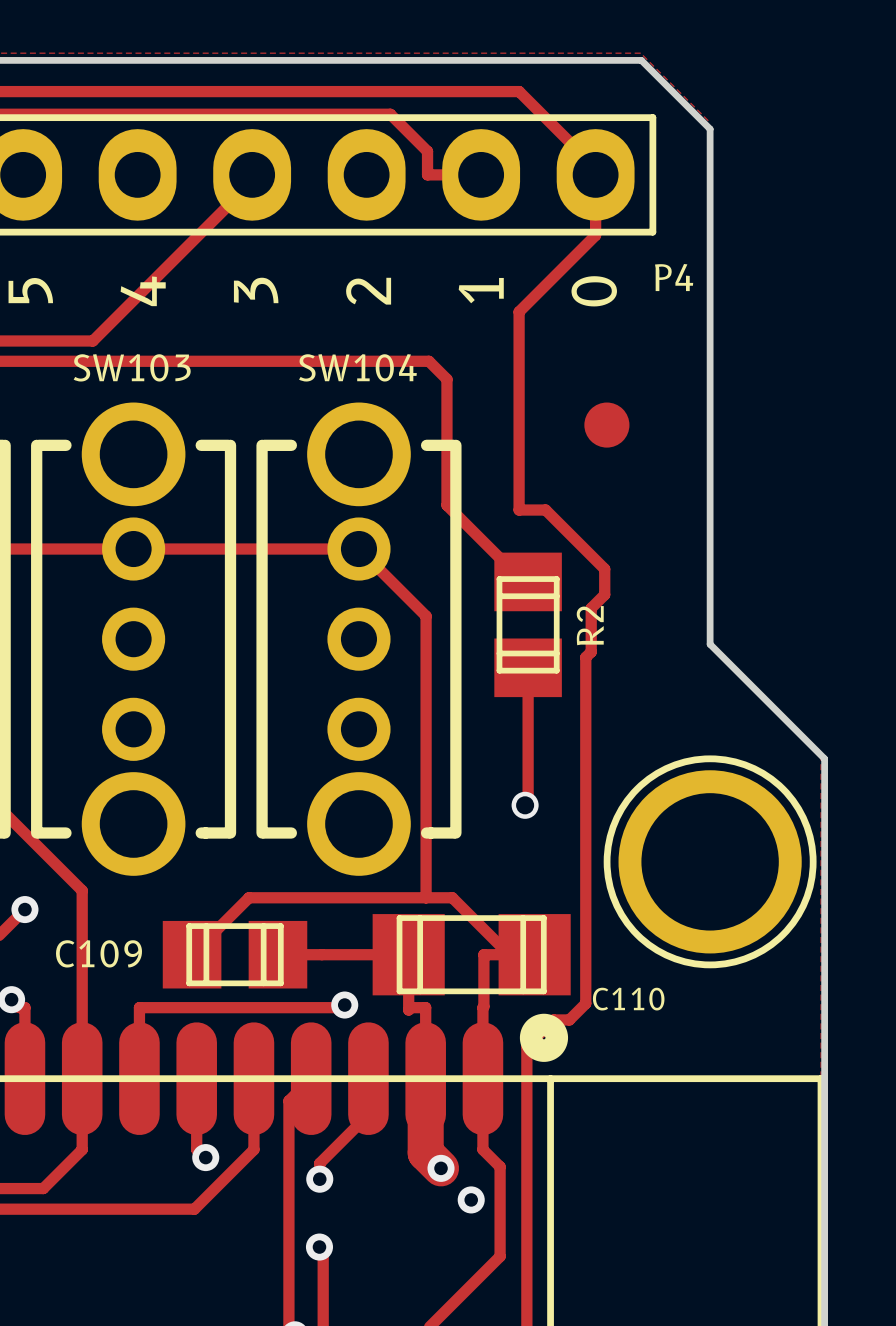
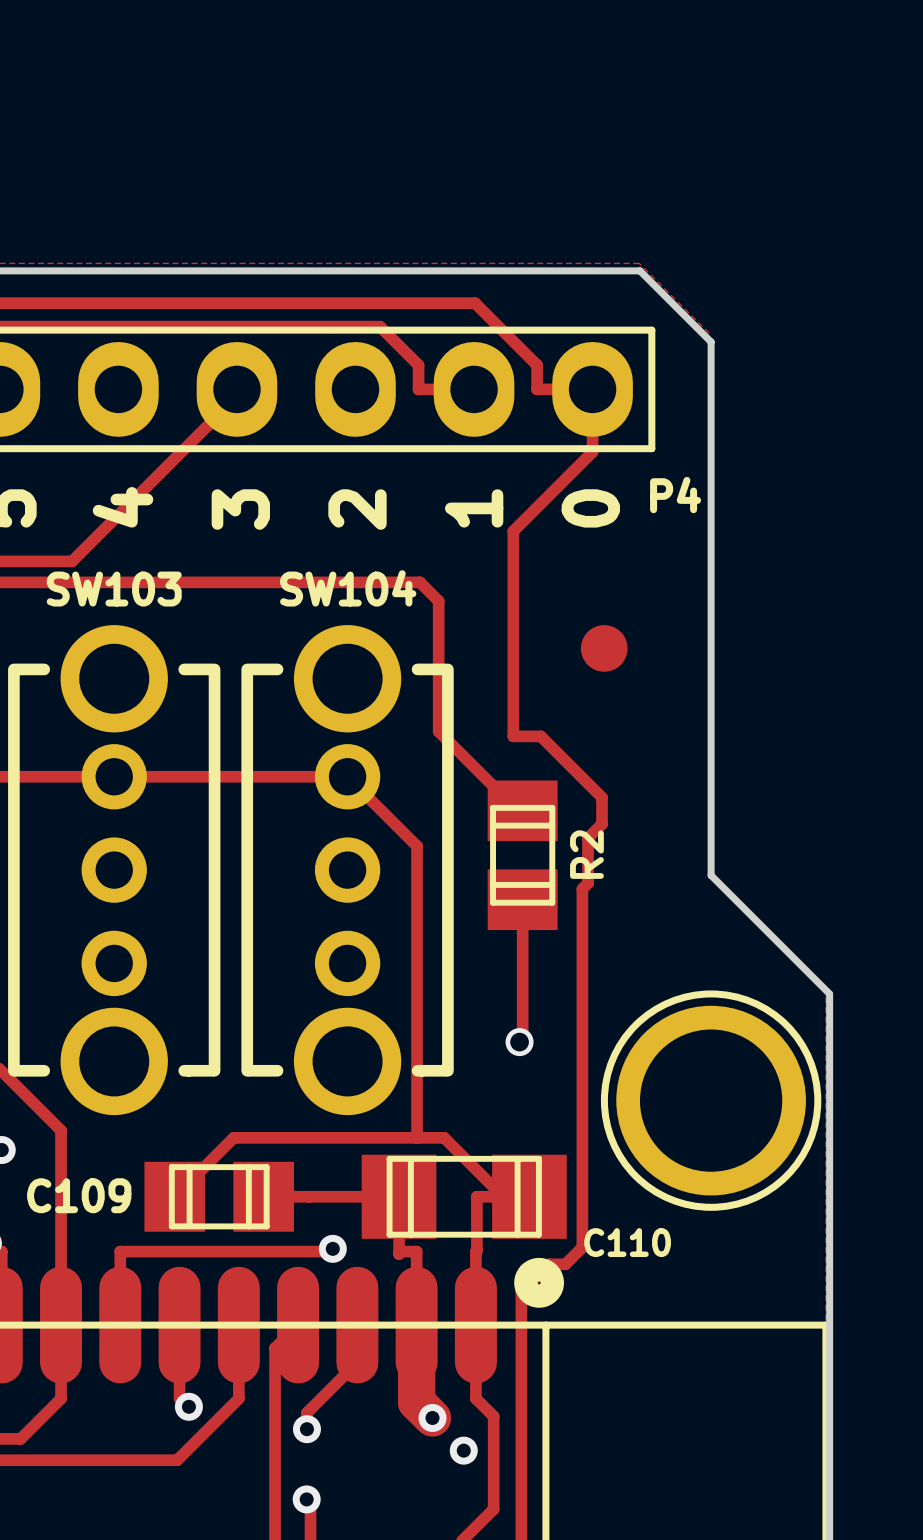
track: (482, 91) (519, 91) (595, 168) (595, 174) -> (475, 303) (537, 365) (537, 389) (592, 389)

